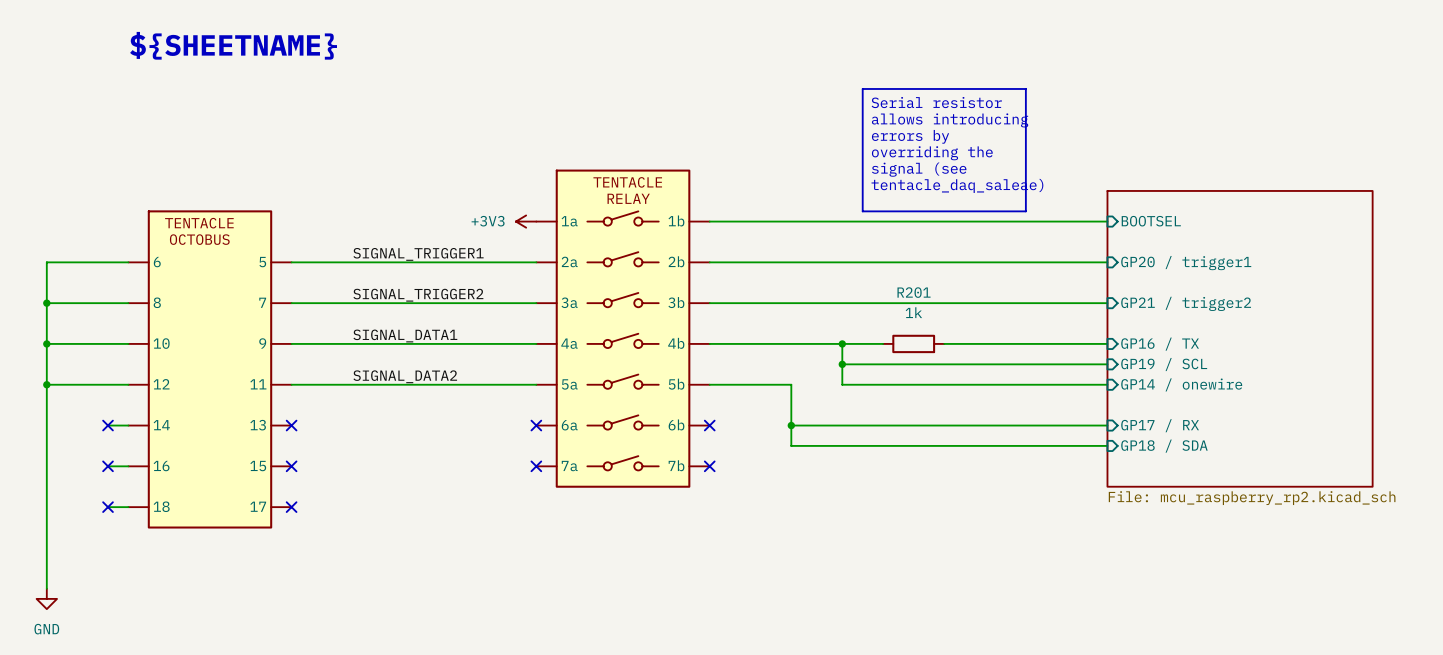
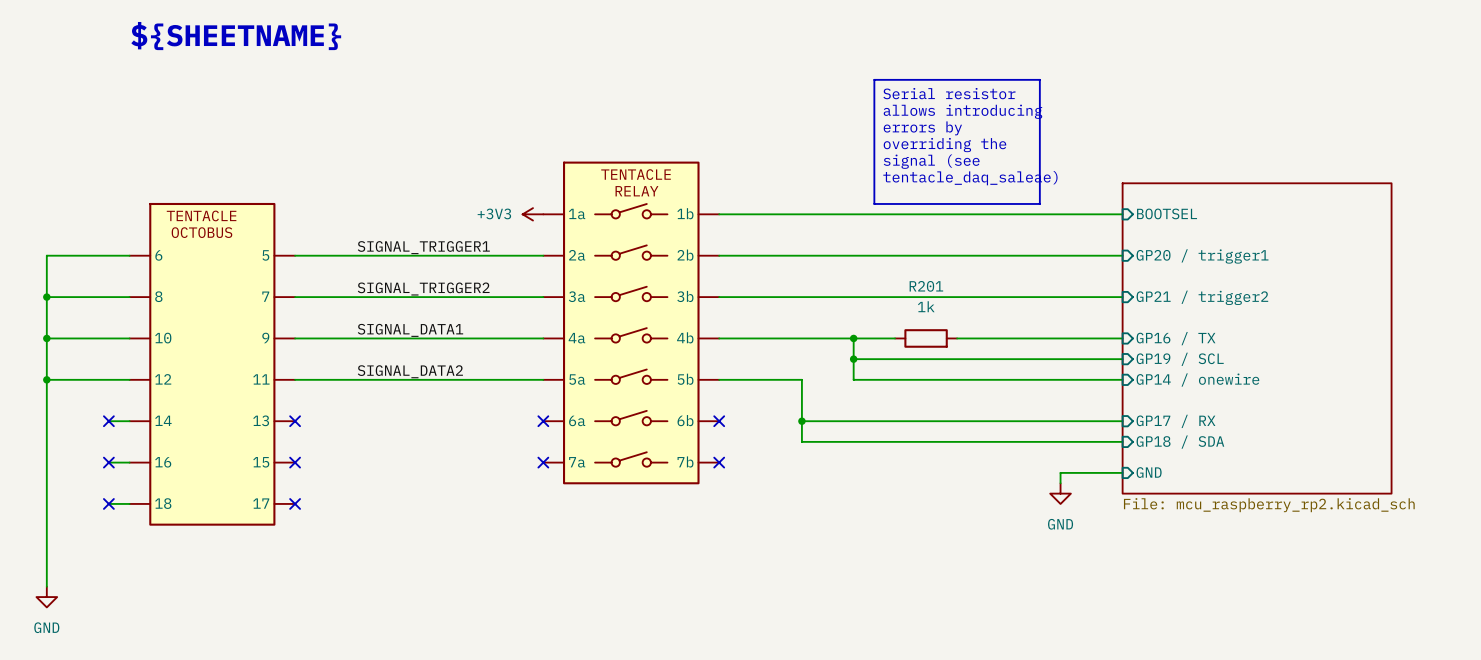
sheet shape: [1106, 190, 1374, 488] -> [1121, 182, 1393, 495]
wire: none -> (1122, 472) (1060, 472) (1060, 483)
sheet pin: none -> GND (1149, 472)
power symbol: none -> GND (1060, 493)

